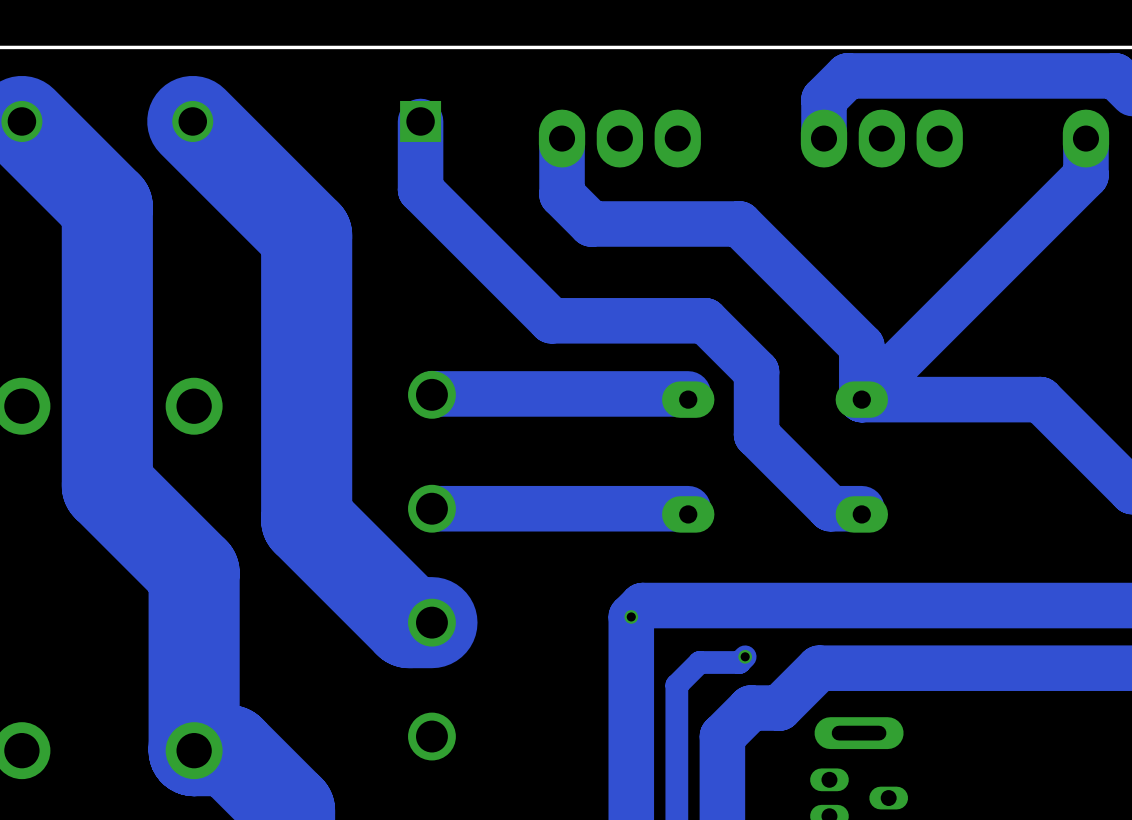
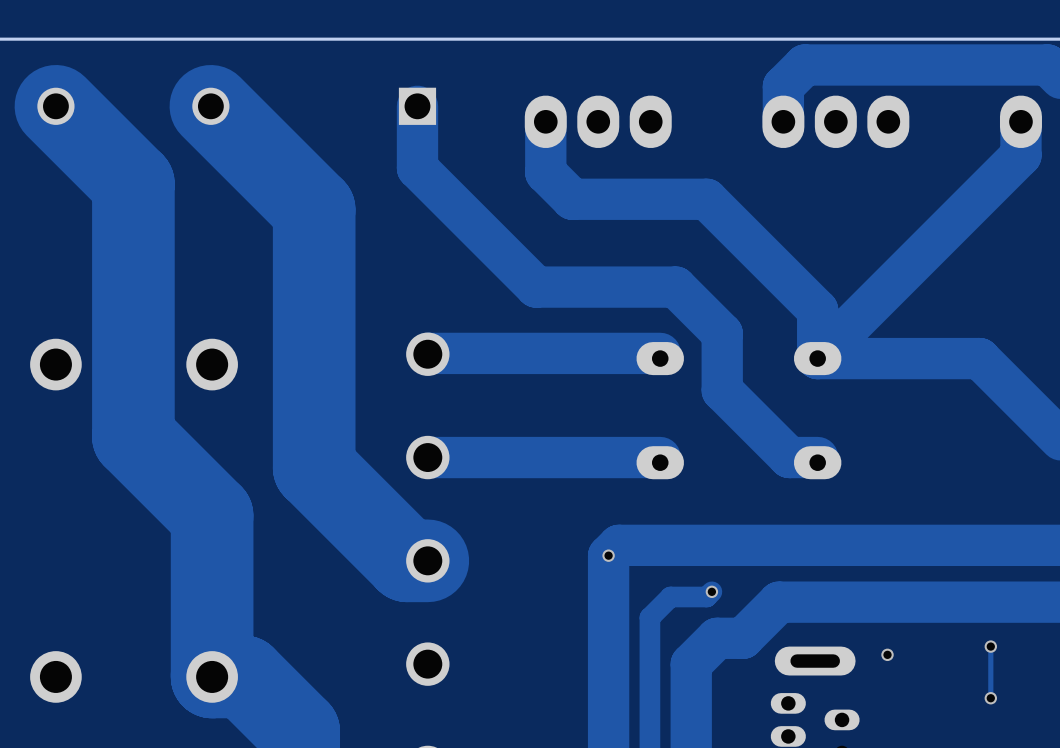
track: none -> (990, 646) (990, 698)
via: none -> (990, 646)
via: none -> (887, 654)
via: none -> (990, 698)

